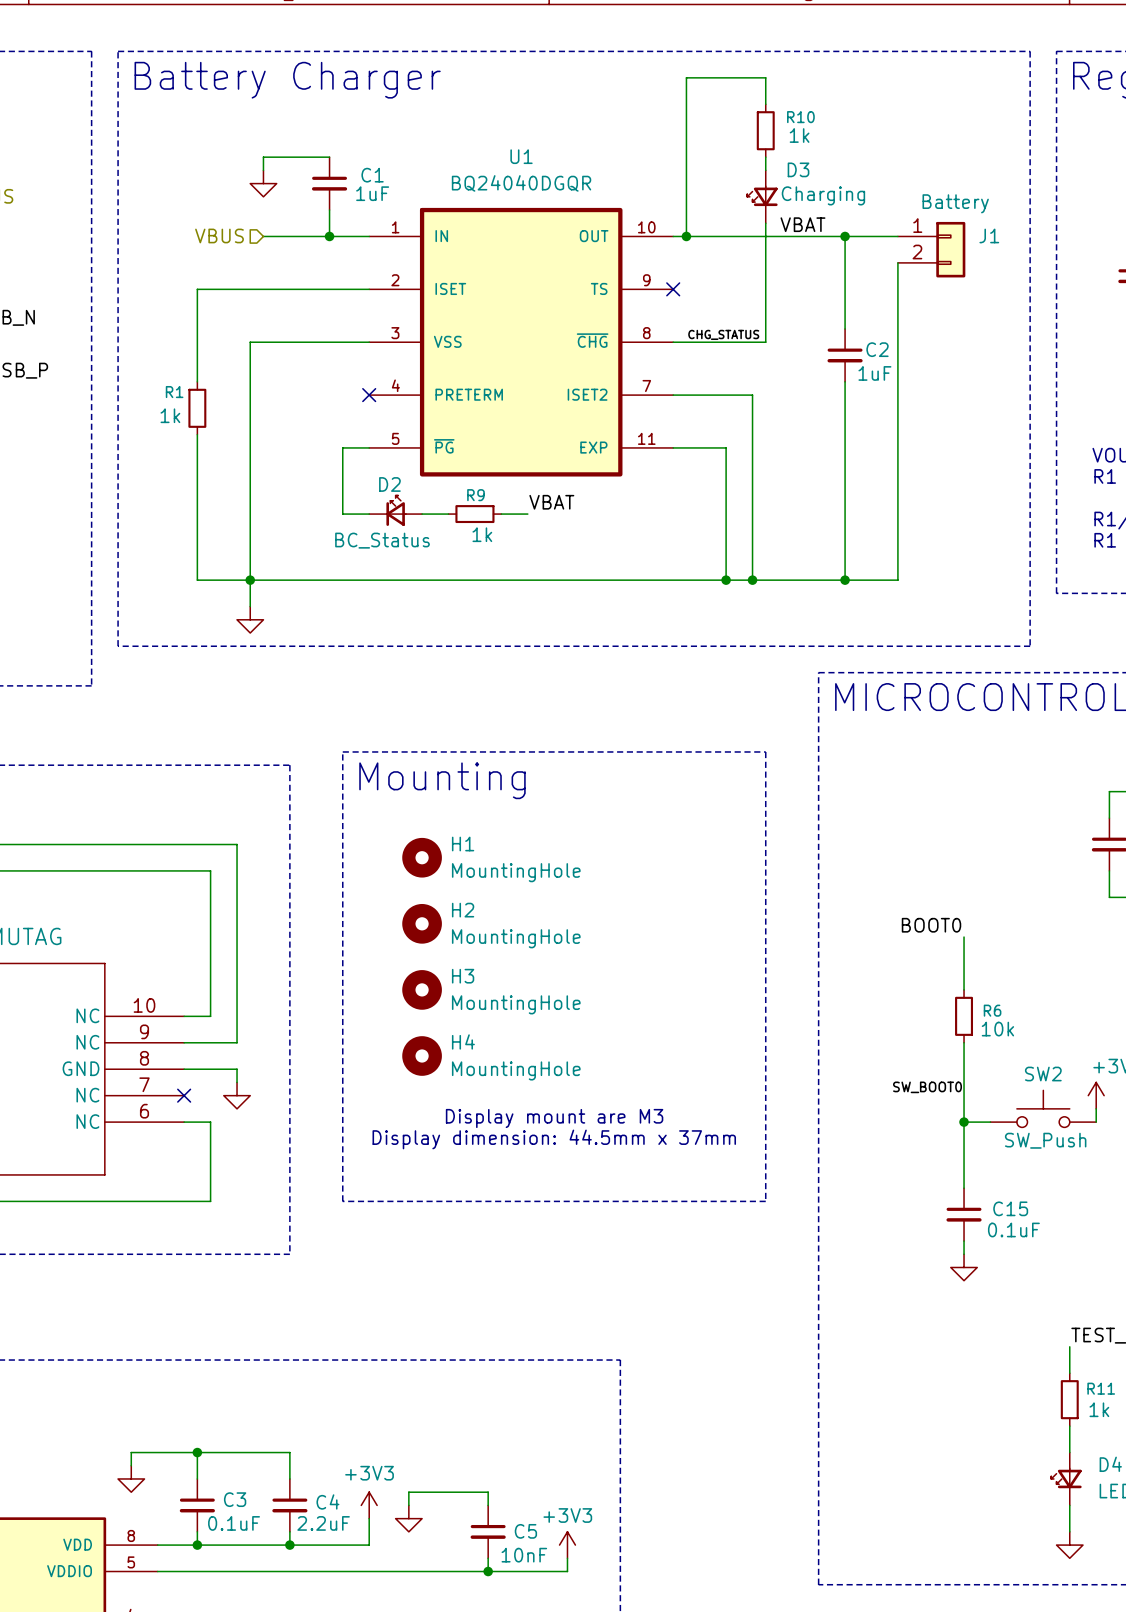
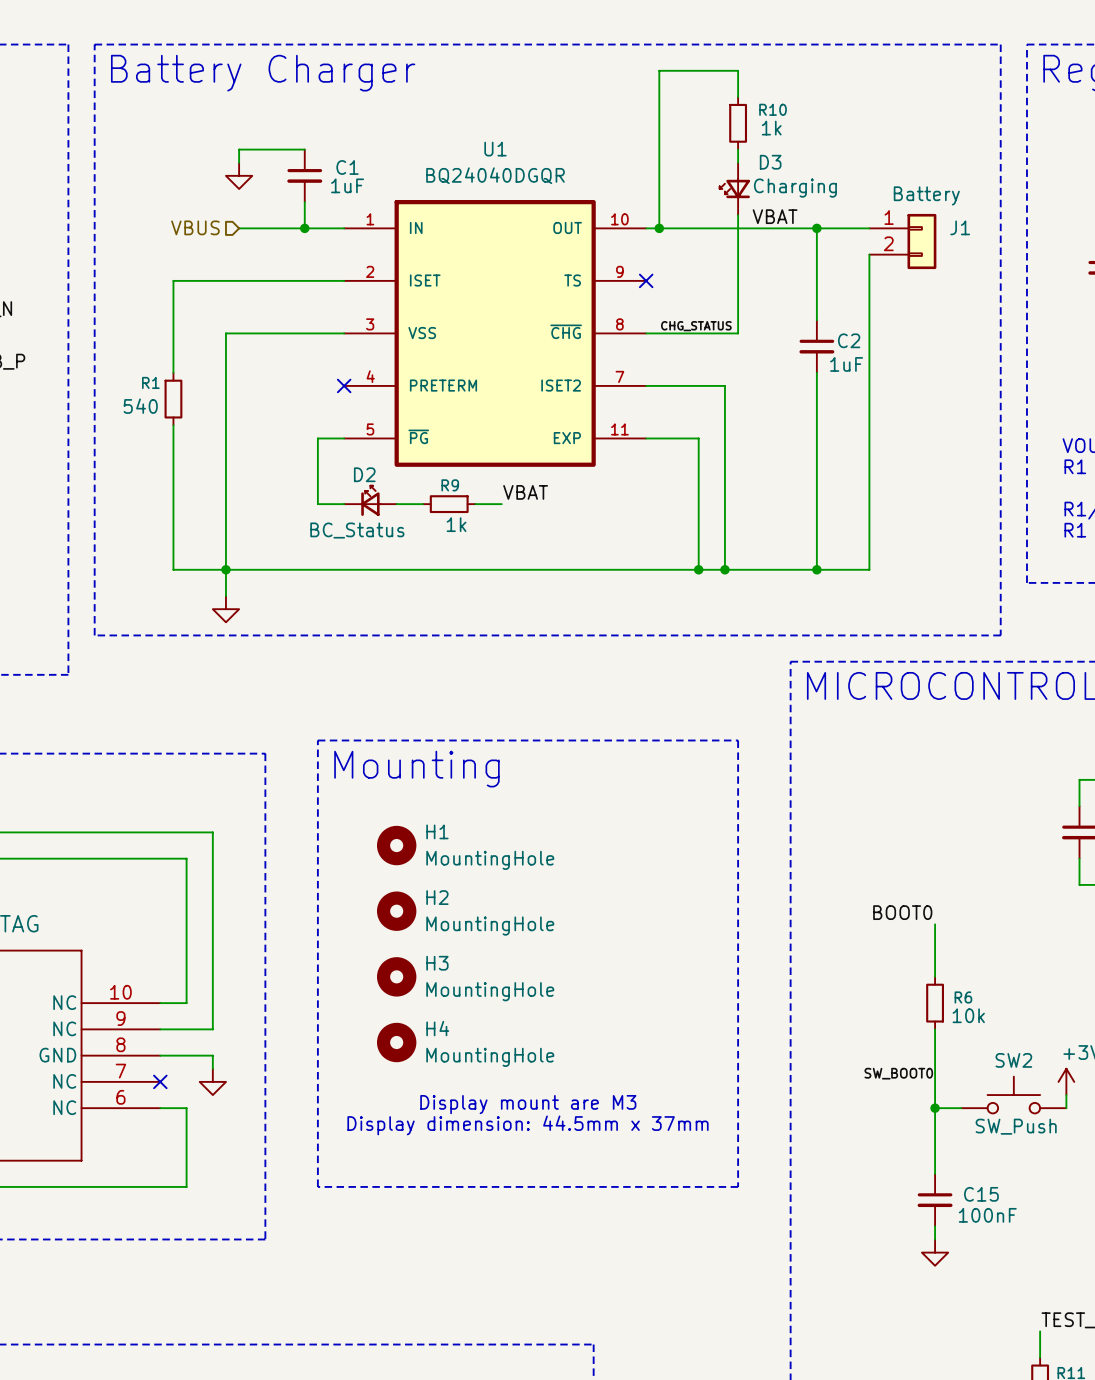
R1 value: 1k (170, 415) -> 540 (140, 406)
C15 value: 0.1uF (1013, 1229) -> 100nF (987, 1215)

